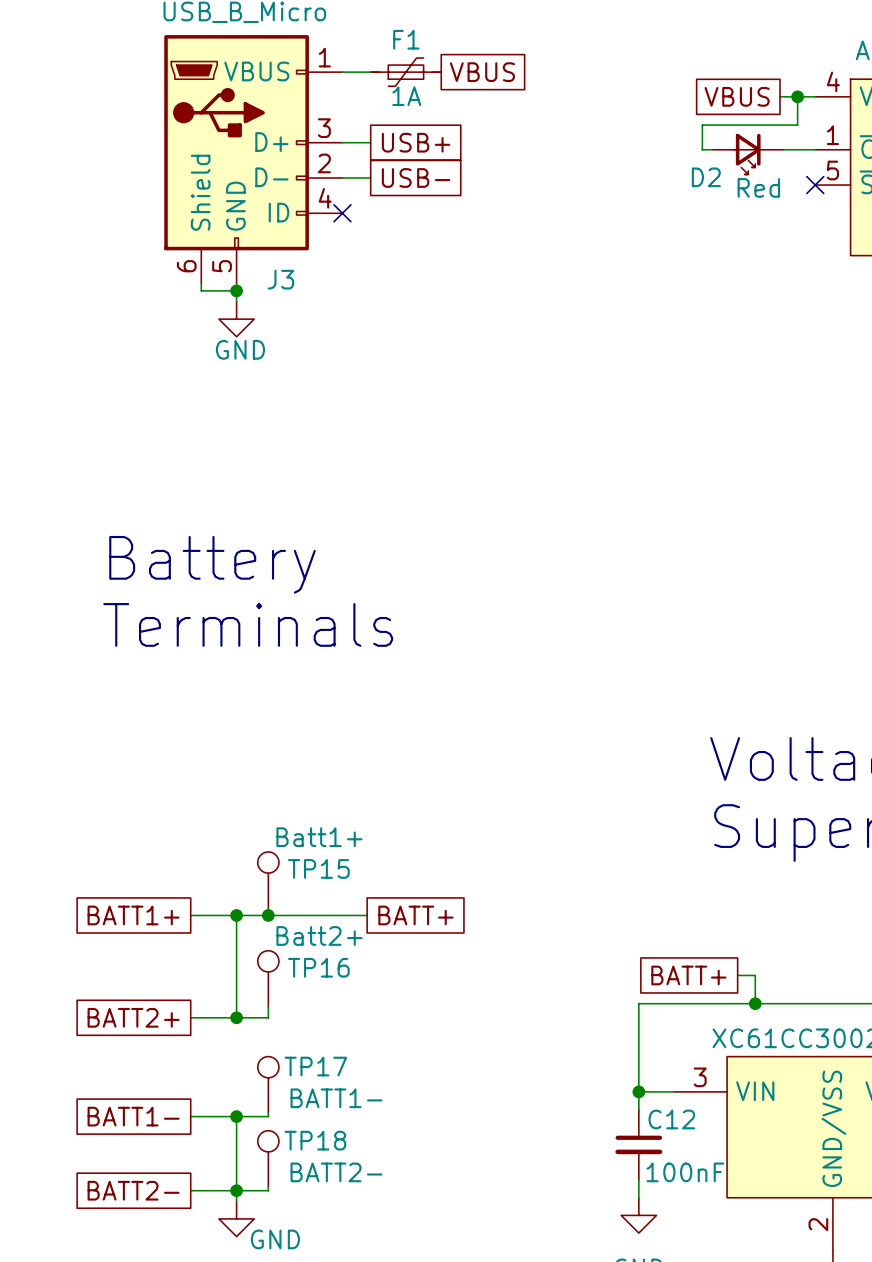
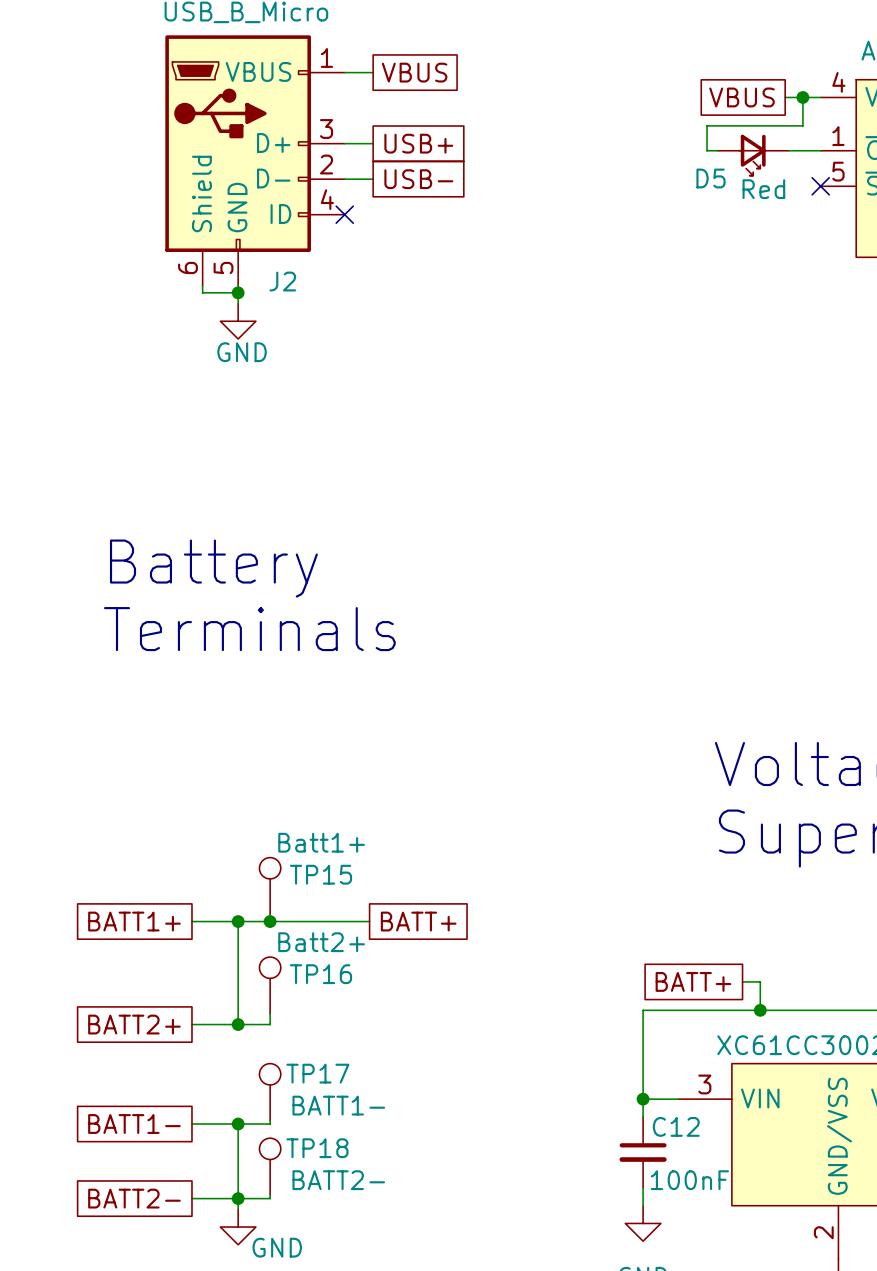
F1: 1A (405, 72) -> none
global label position: VBUS (482, 72) -> VBUS (414, 72)
D2 name: D2 (706, 177) -> D5 (711, 178)
J3 name: J3 (280, 279) -> J2 (282, 281)

